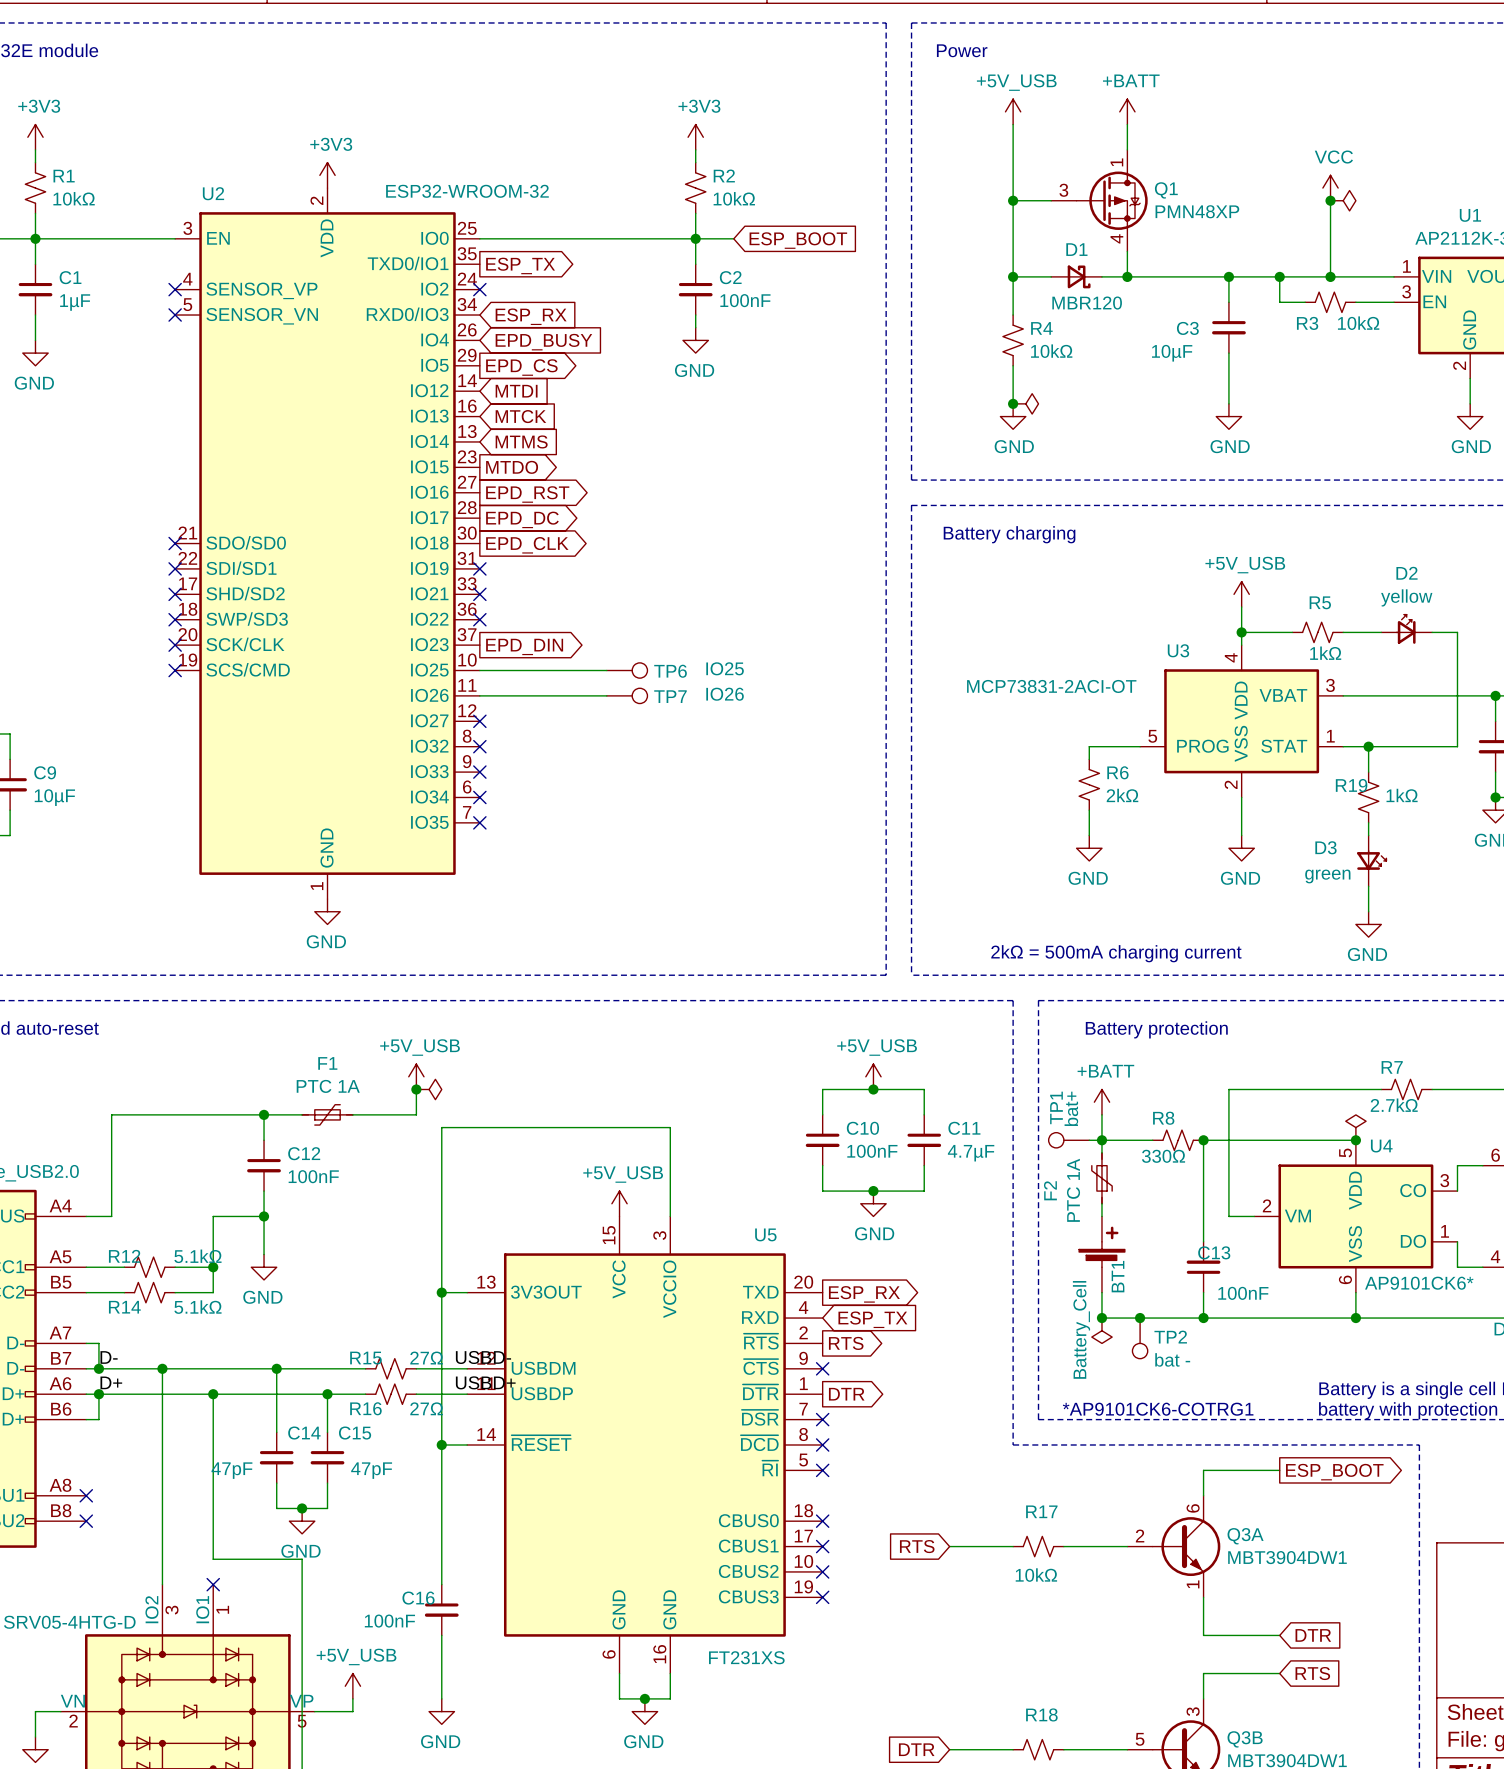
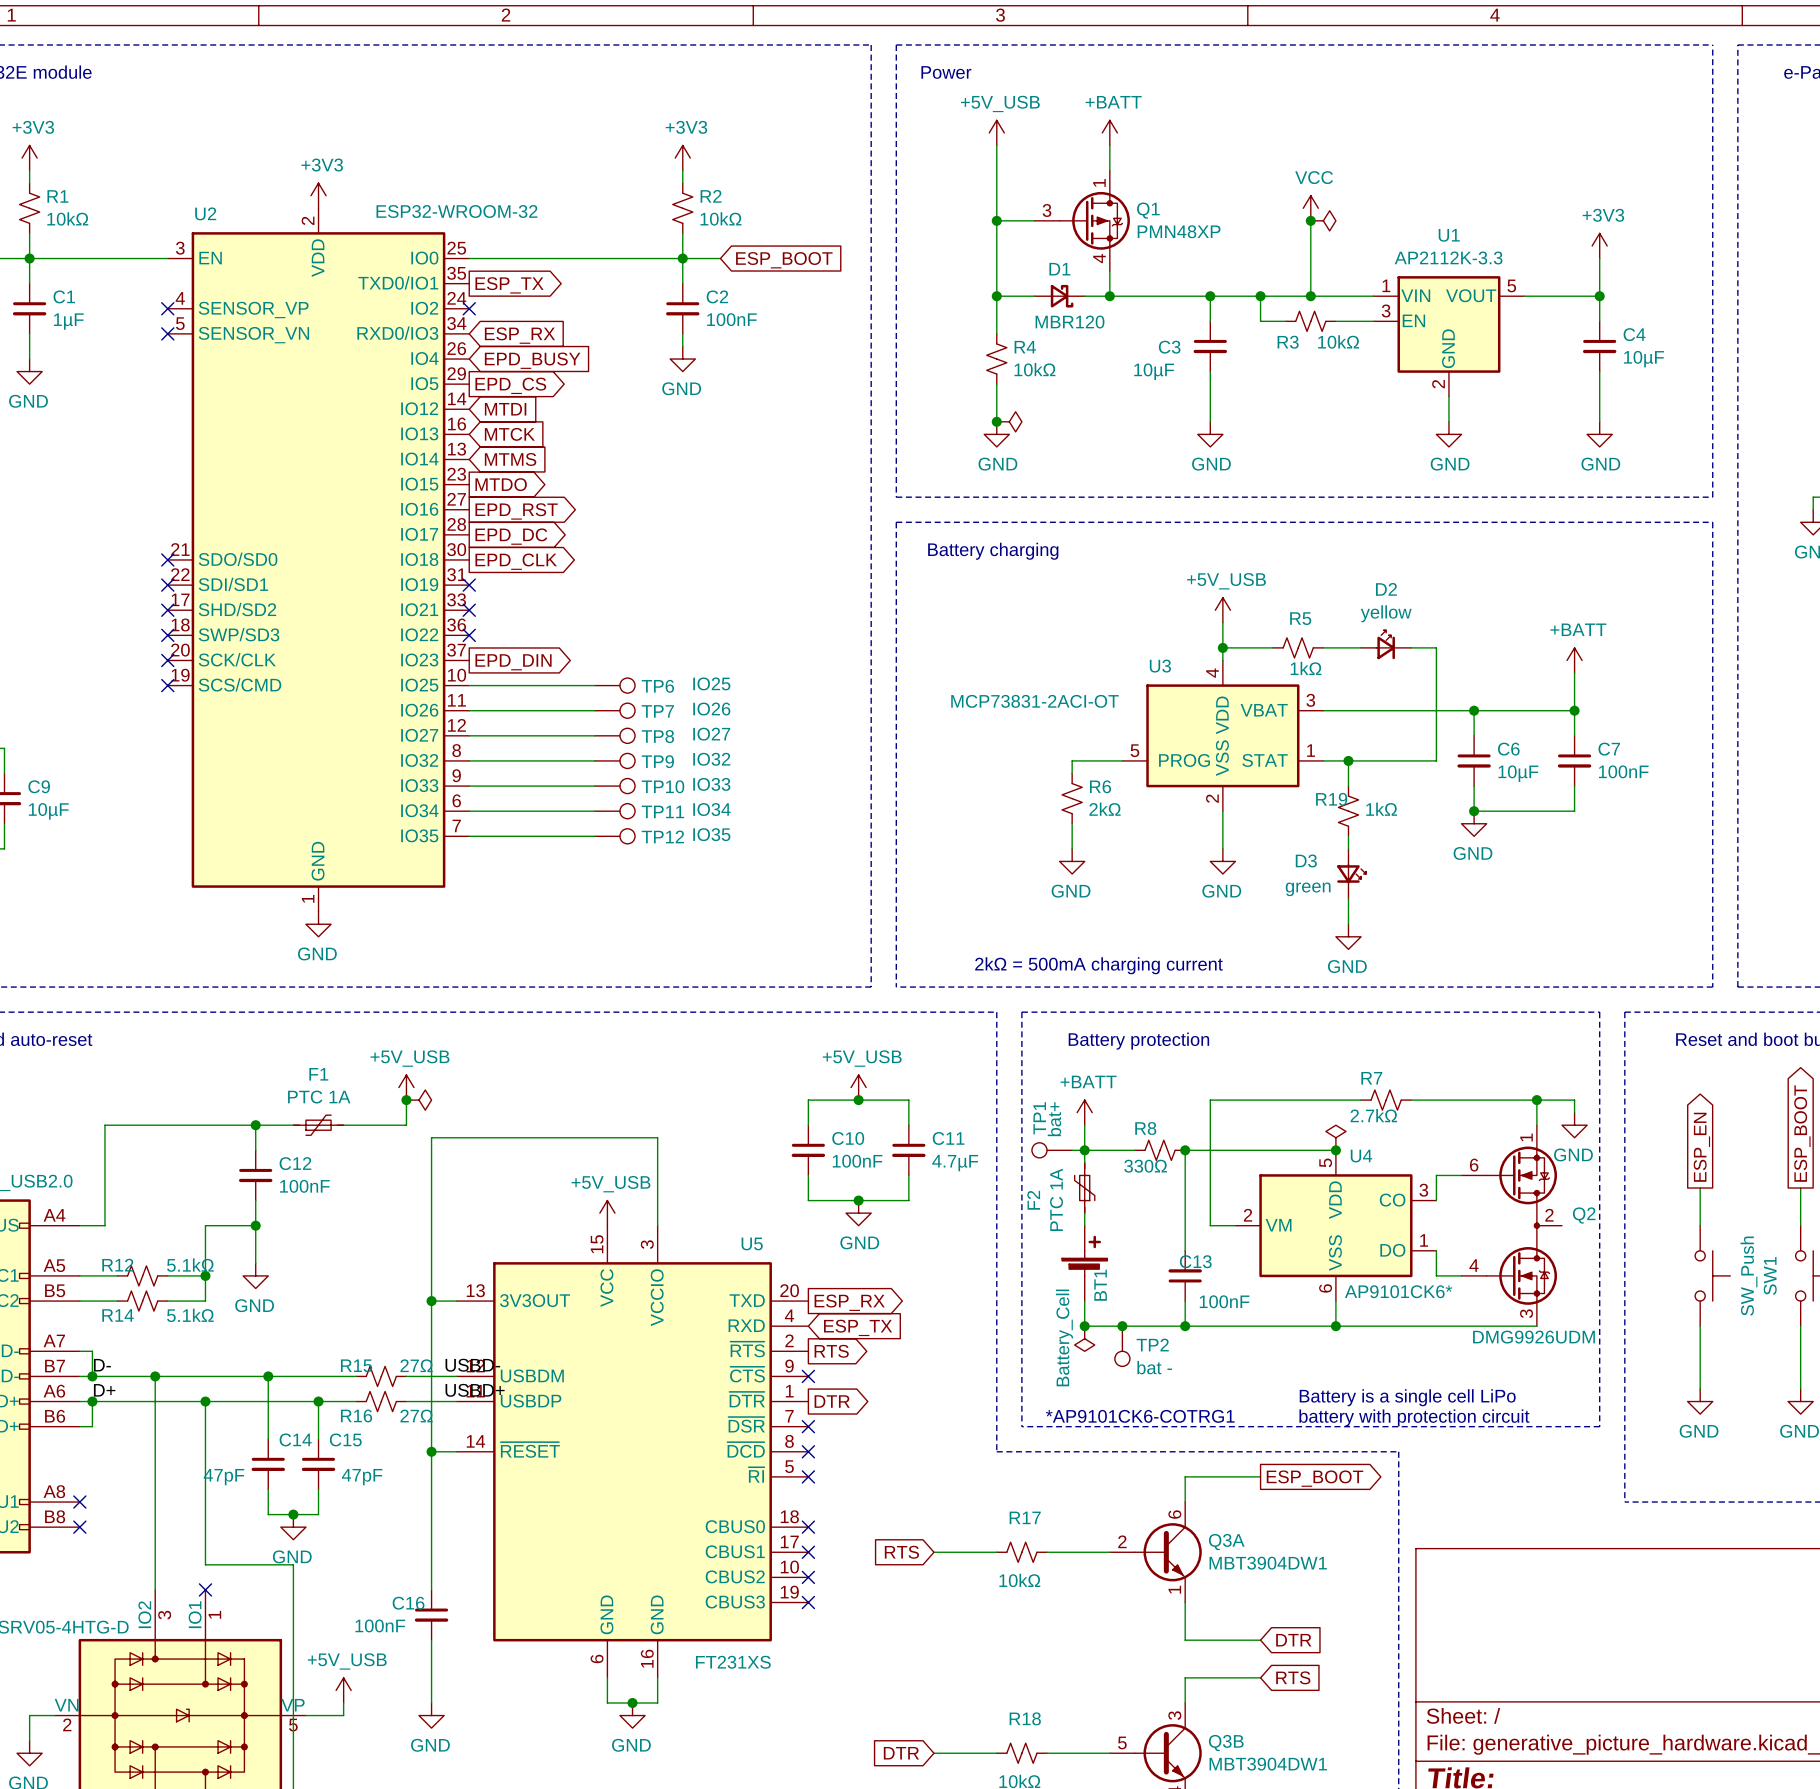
wire: none -> (469, 735) (594, 735)
no-connect mark: (479, 721) -> none
TP8: none -> IO27 (614, 735)
wire: none -> (469, 760) (594, 760)
no-connect mark: (479, 746) -> none
TP9: none -> IO32 (614, 760)
wire: none -> (469, 786) (594, 786)
no-connect mark: (479, 772) -> none
TP10: none -> IO33 (614, 786)
wire: none -> (469, 811) (594, 811)
no-connect mark: (479, 797) -> none
TP11: none -> IO34 (614, 811)
wire: none -> (469, 836) (594, 836)
no-connect mark: (479, 822) -> none
TP12: none -> IO35 (614, 836)

